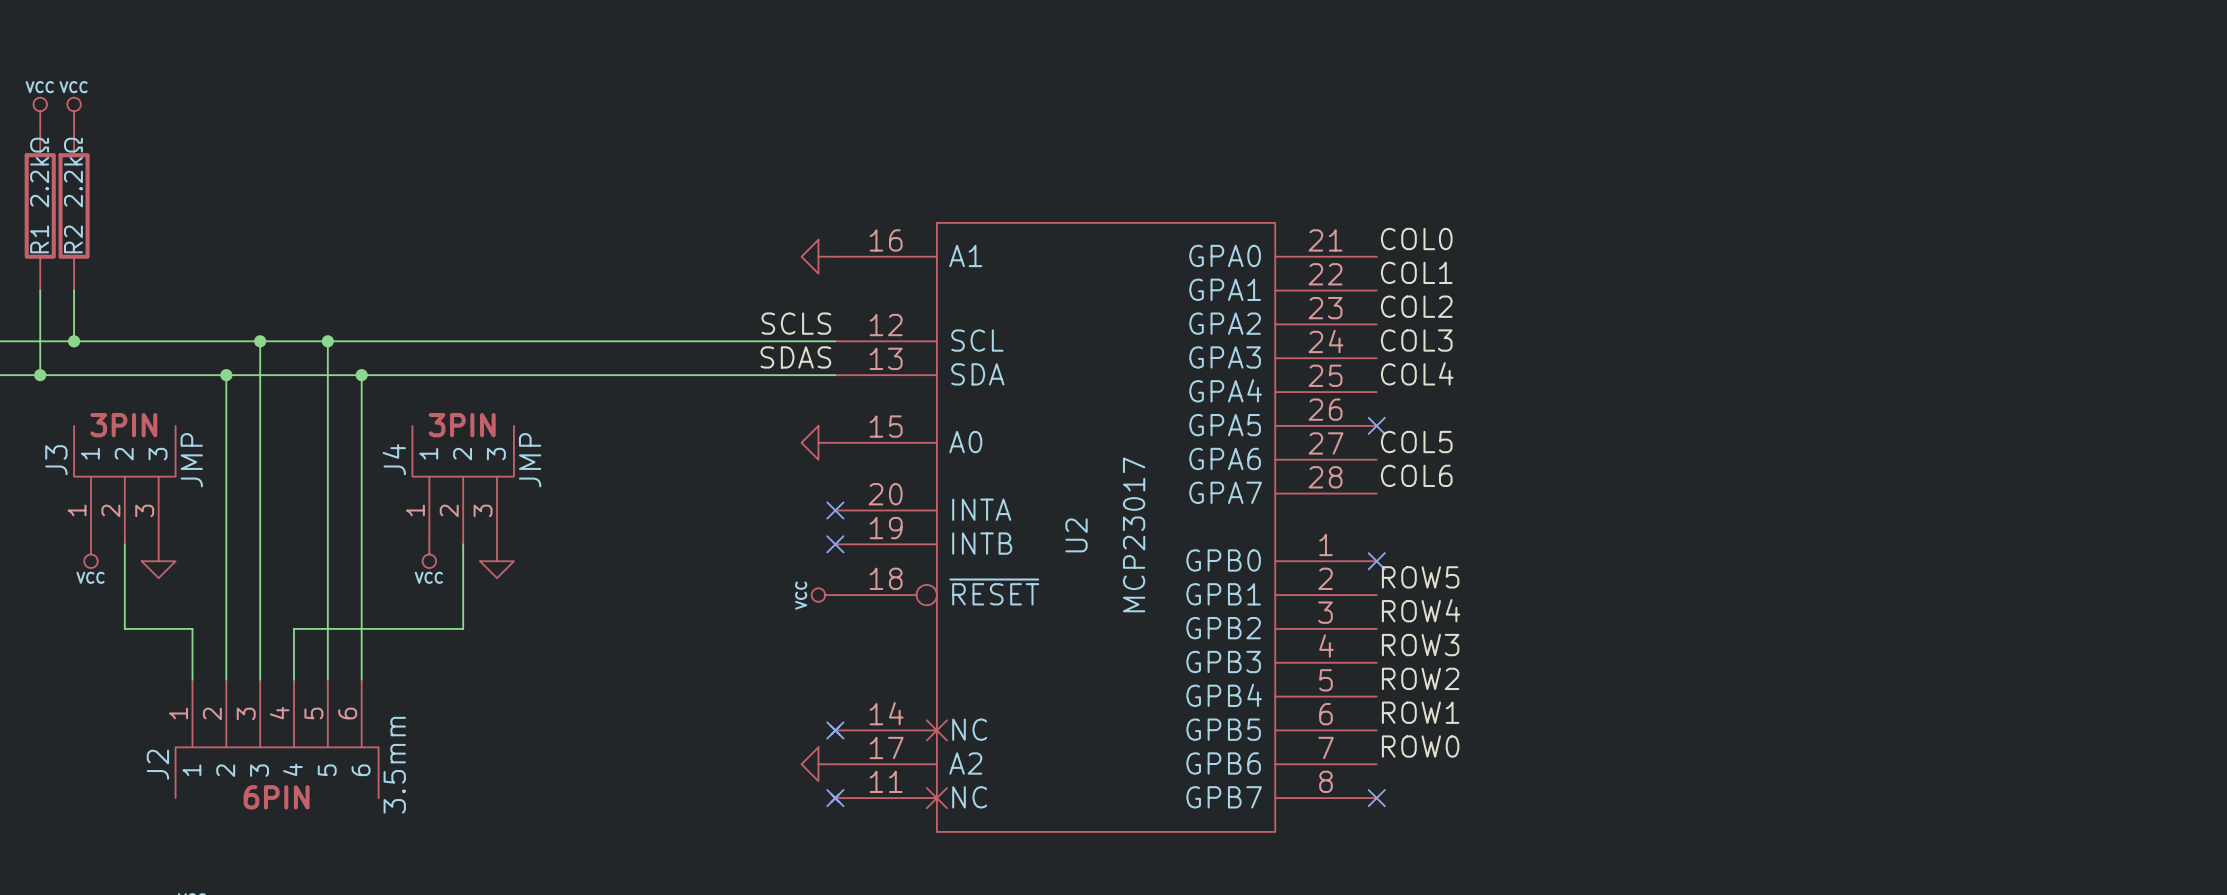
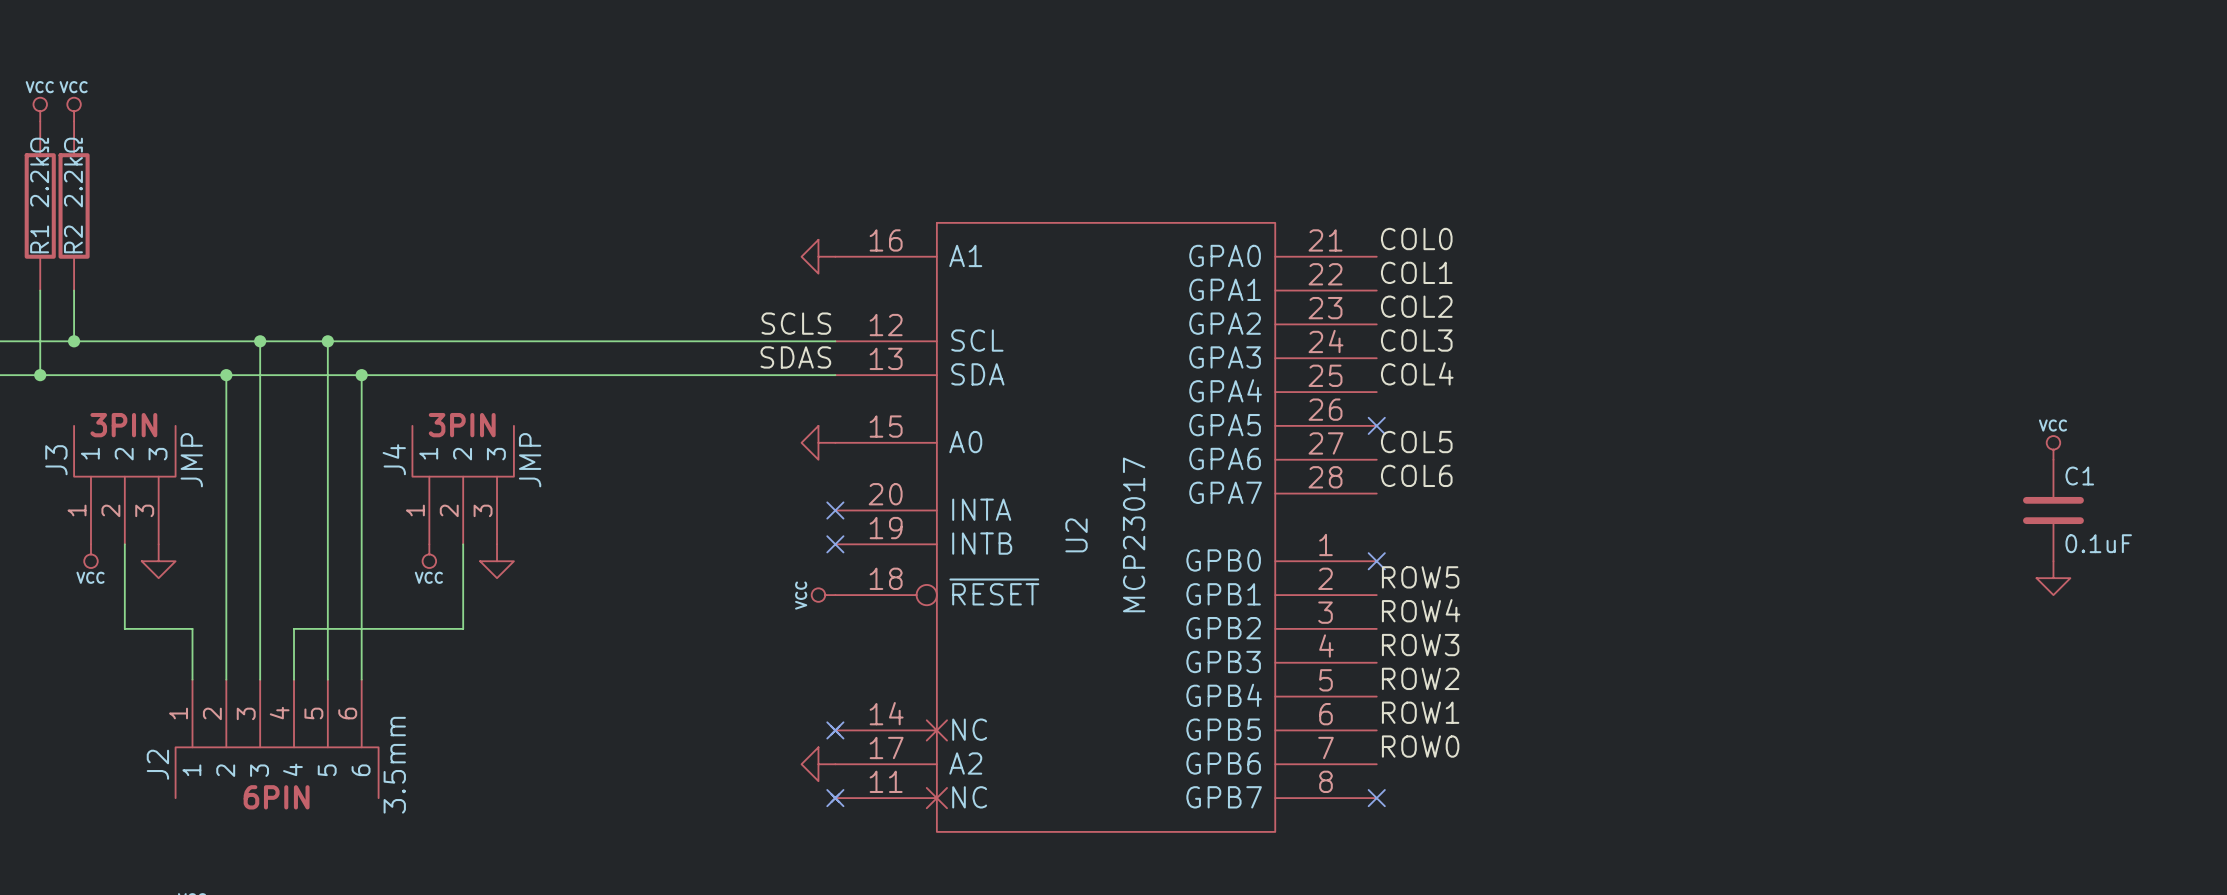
power symbol: none -> VCC (2053, 447)
C1: none -> 0.1uF (2053, 510)
power symbol: none -> (2053, 578)

